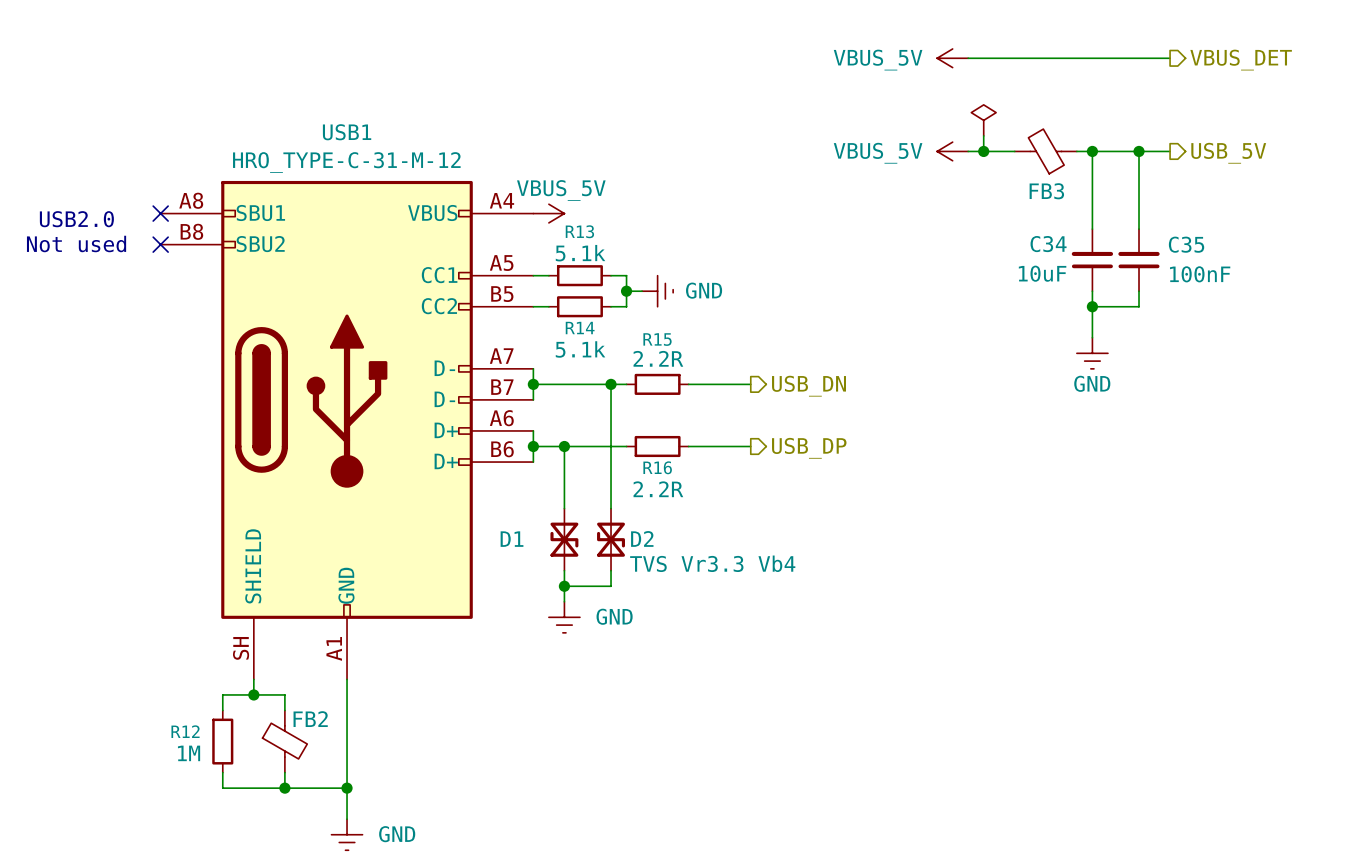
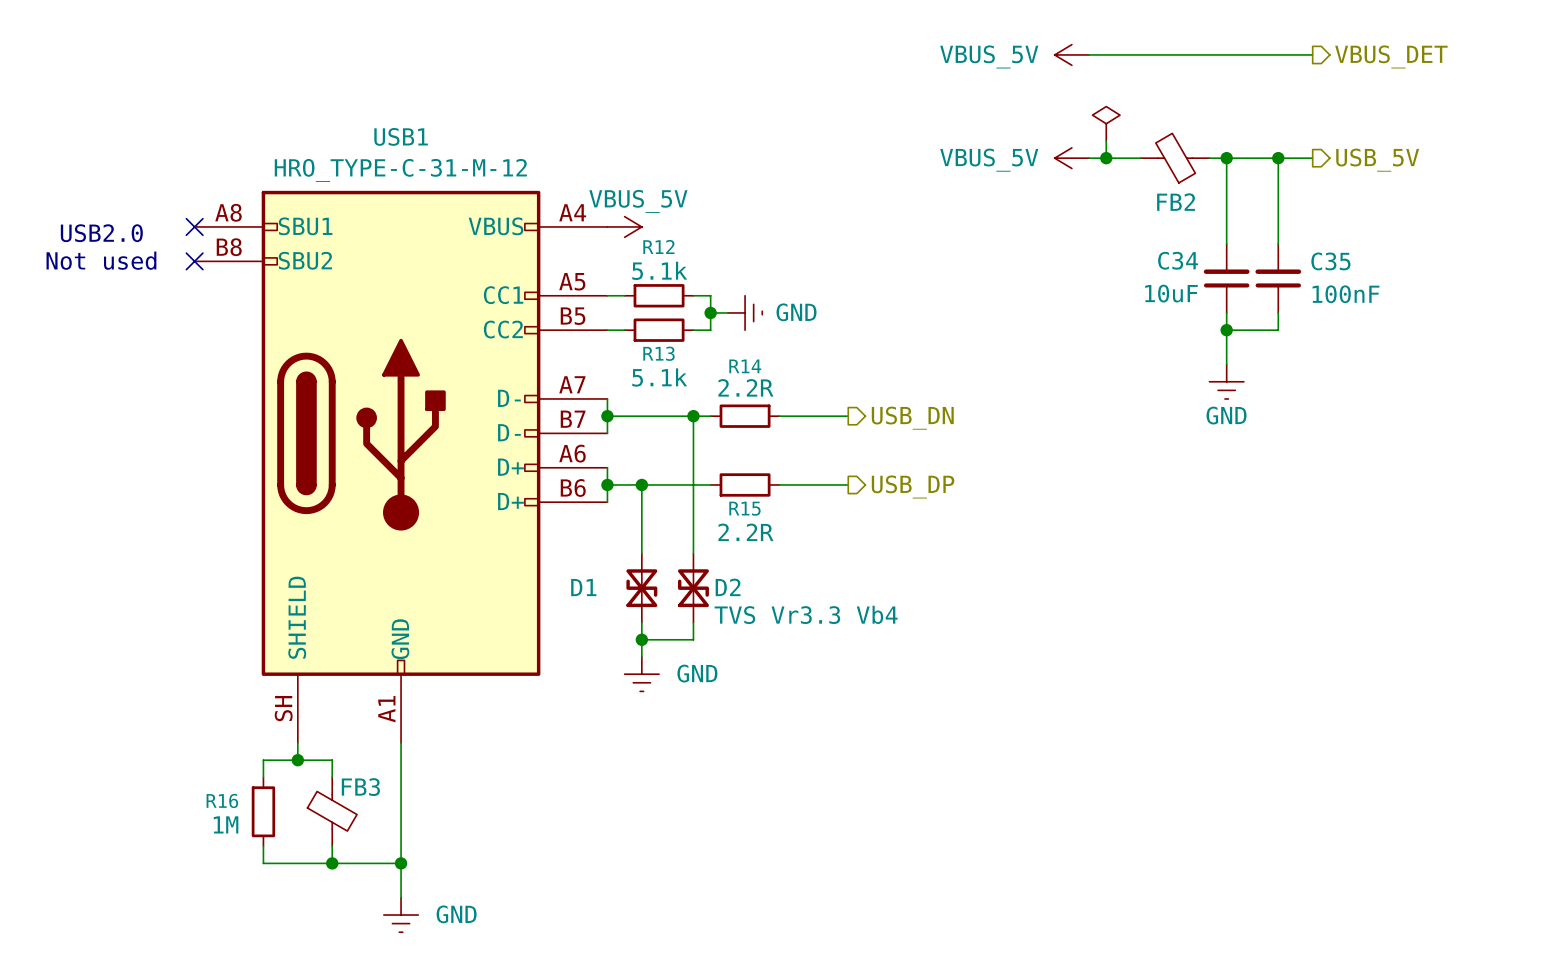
FB3 name: FB3 (1046, 191) -> FB2 (1176, 202)
R13 name: R13 (579, 231) -> R12 (658, 246)
R14 name: R14 (580, 328) -> R13 (659, 353)
R15 name: R15 (657, 339) -> R14 (745, 366)
R16 name: R16 (657, 467) -> R15 (744, 508)
FB2 name: FB2 (310, 719) -> FB3 (360, 787)
R12 name: R12 (185, 731) -> R16 (222, 800)

